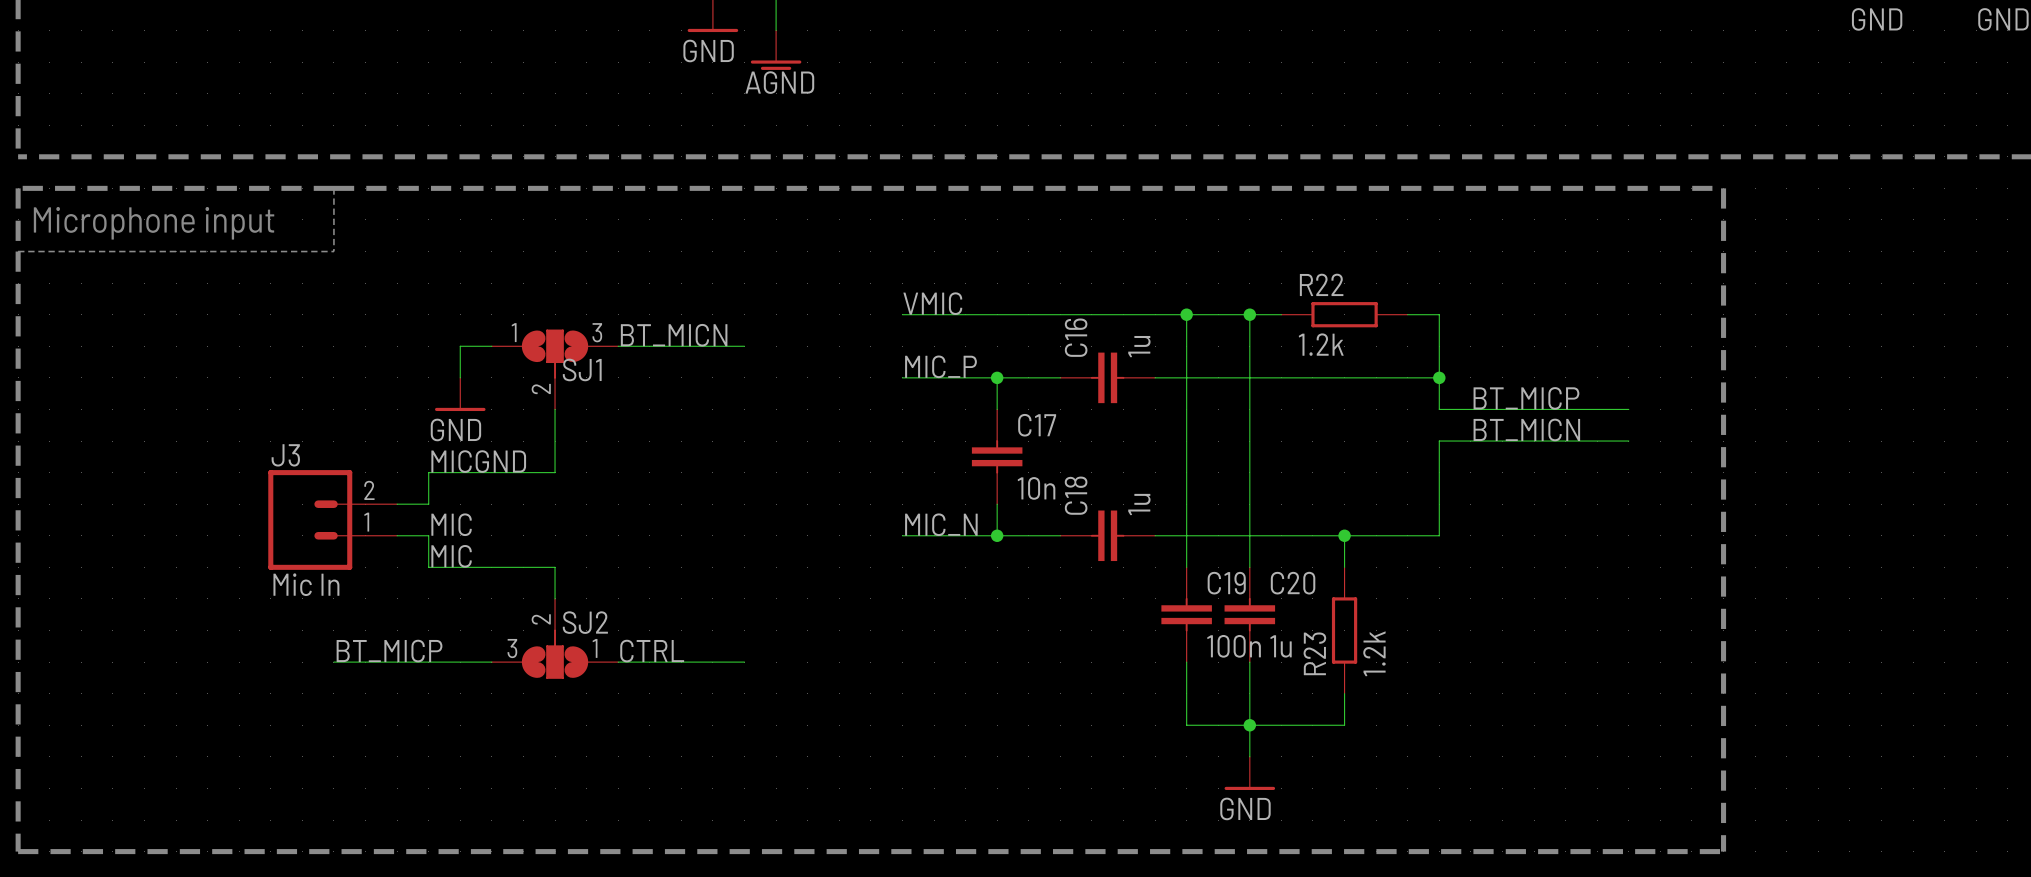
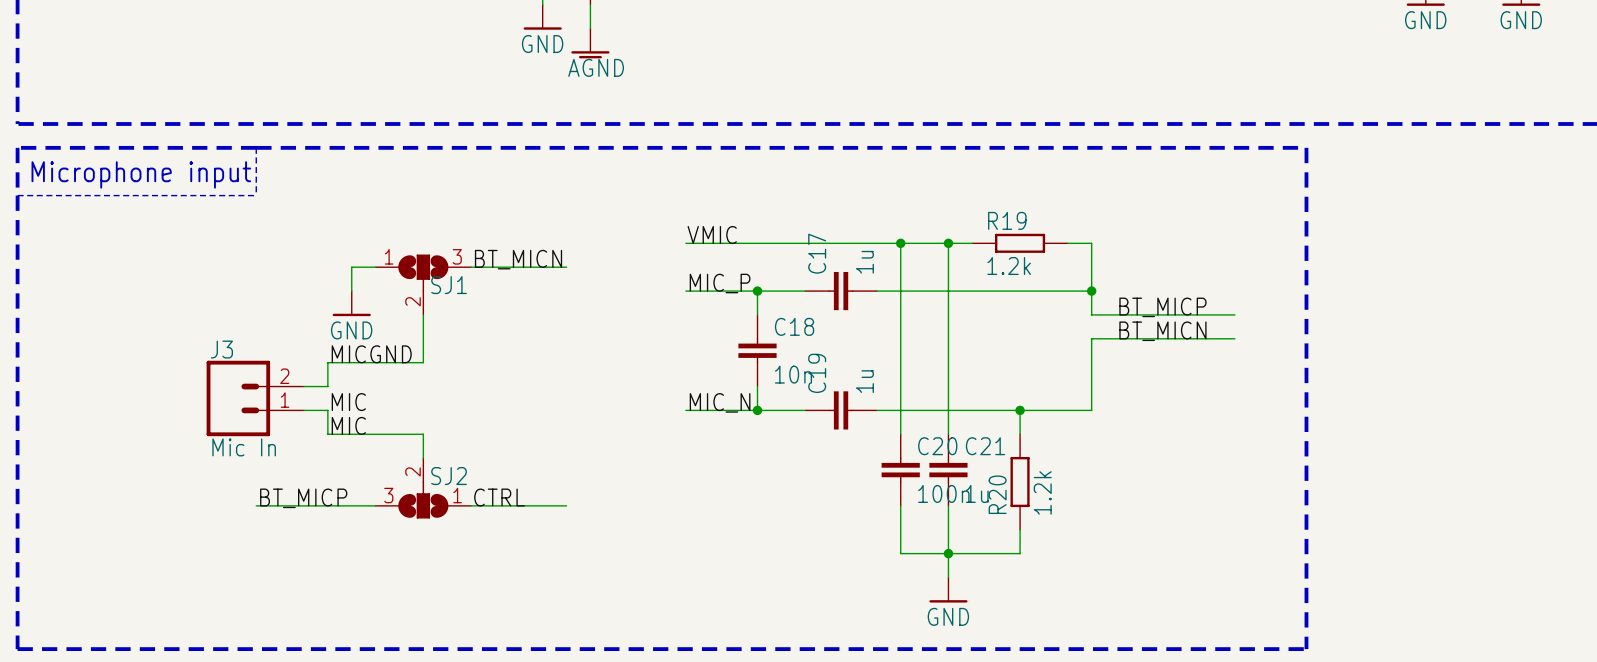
R22 name: R22 (1321, 284) -> R19 (1007, 220)
C16 name: C16 (1076, 337) -> C17 (817, 253)
C17 name: C17 (1037, 425) -> C18 (794, 326)
C18 name: C18 (1076, 495) -> C19 (817, 373)
C19 name: C19 (1226, 583) -> C20 (937, 446)
C20 name: C20 (1293, 583) -> C21 (985, 446)
R23 name: R23 (1314, 653) -> R20 (997, 494)

